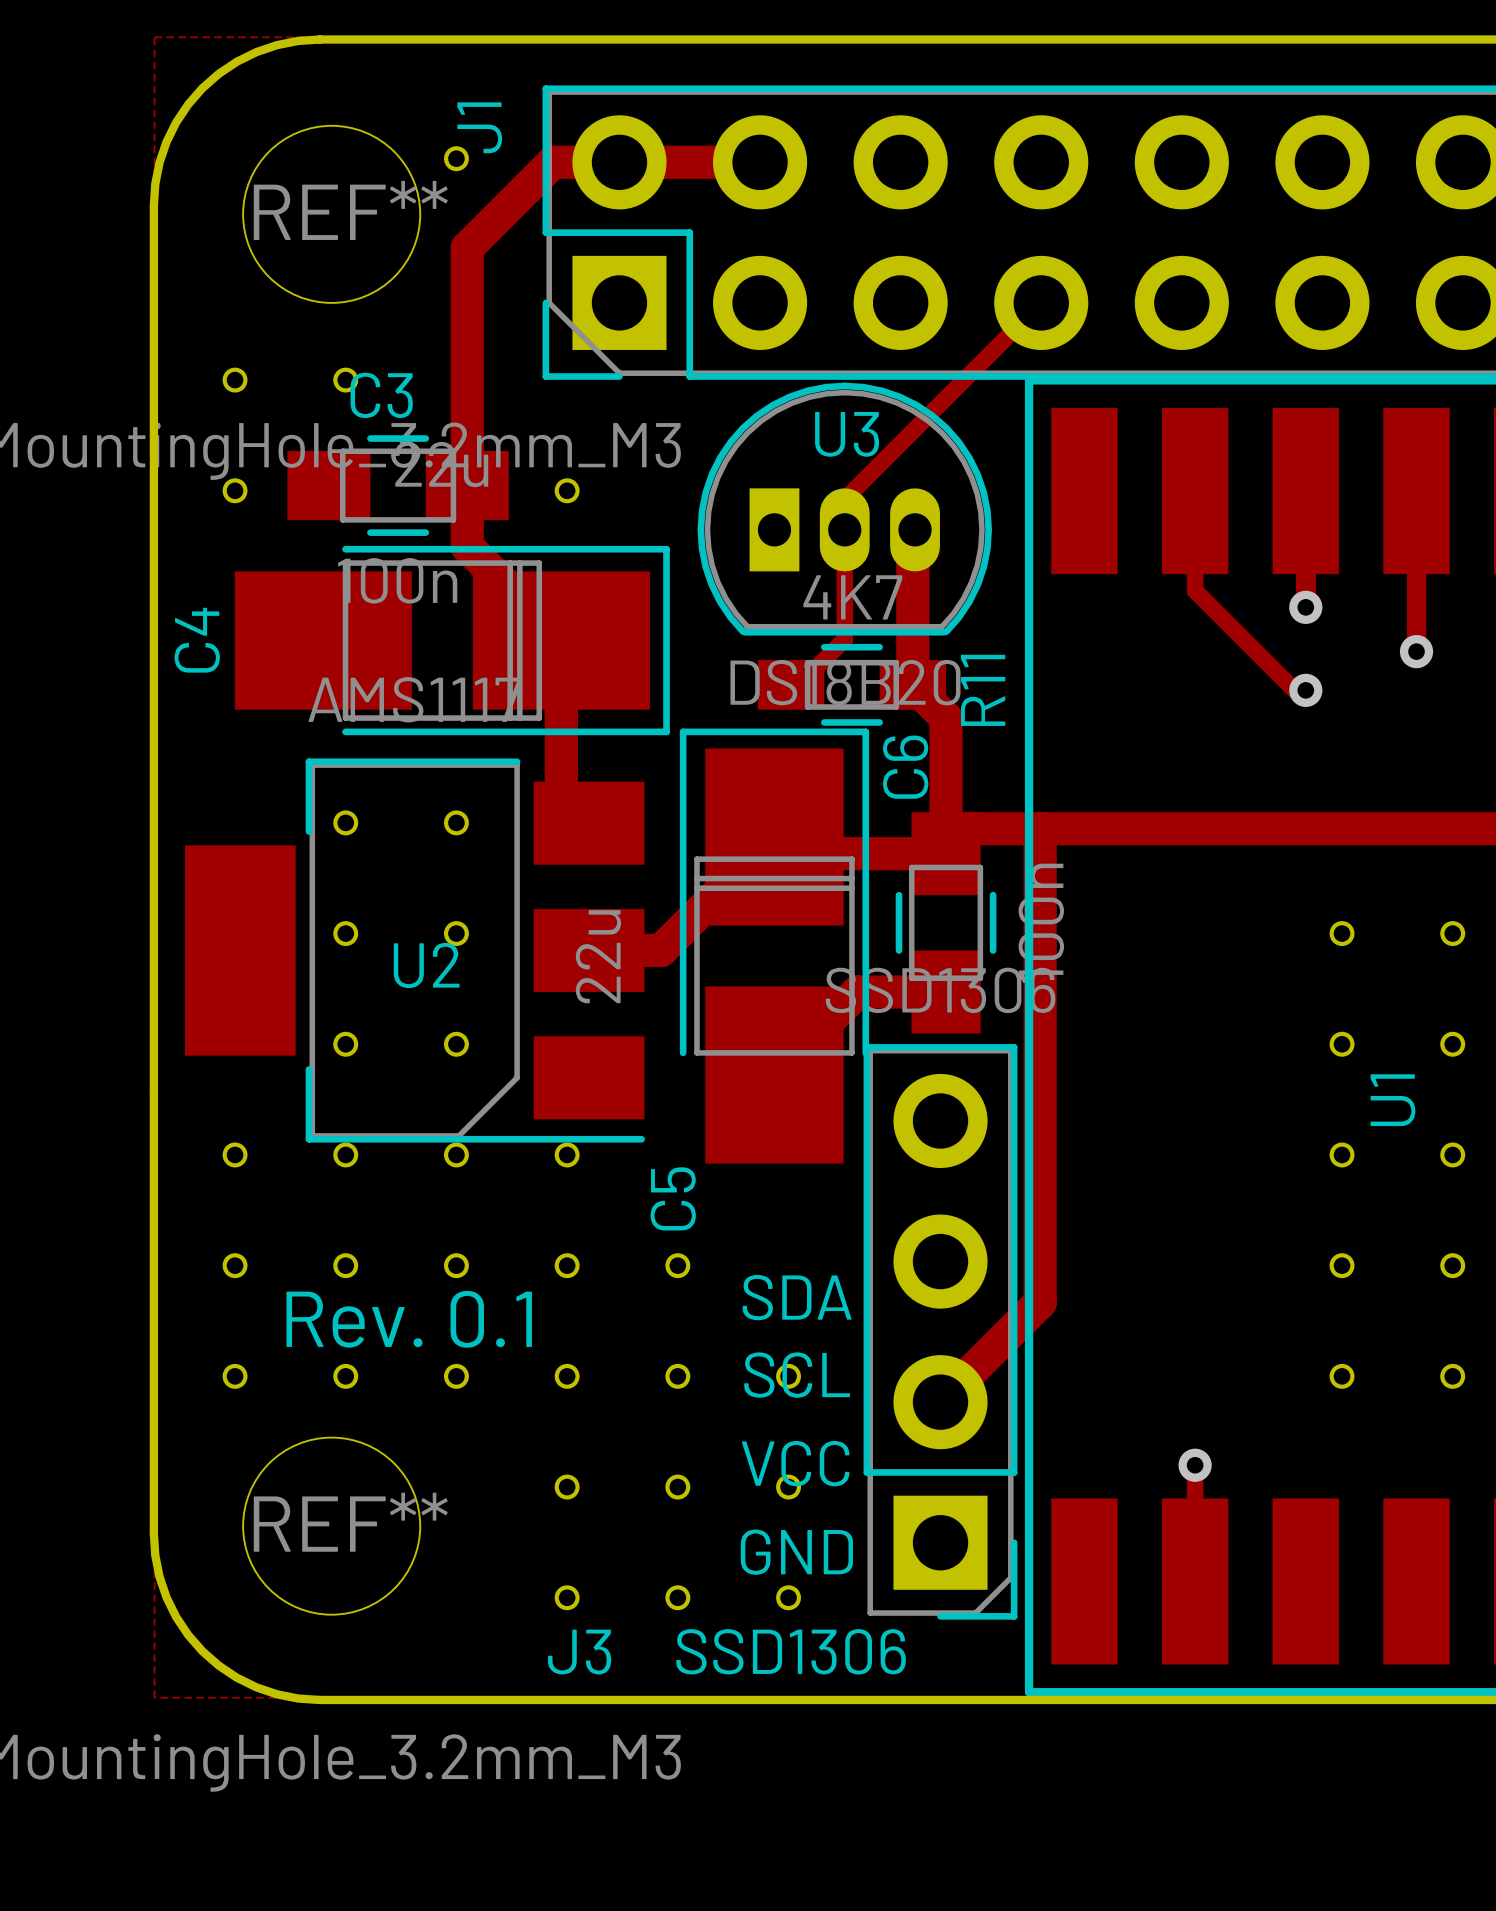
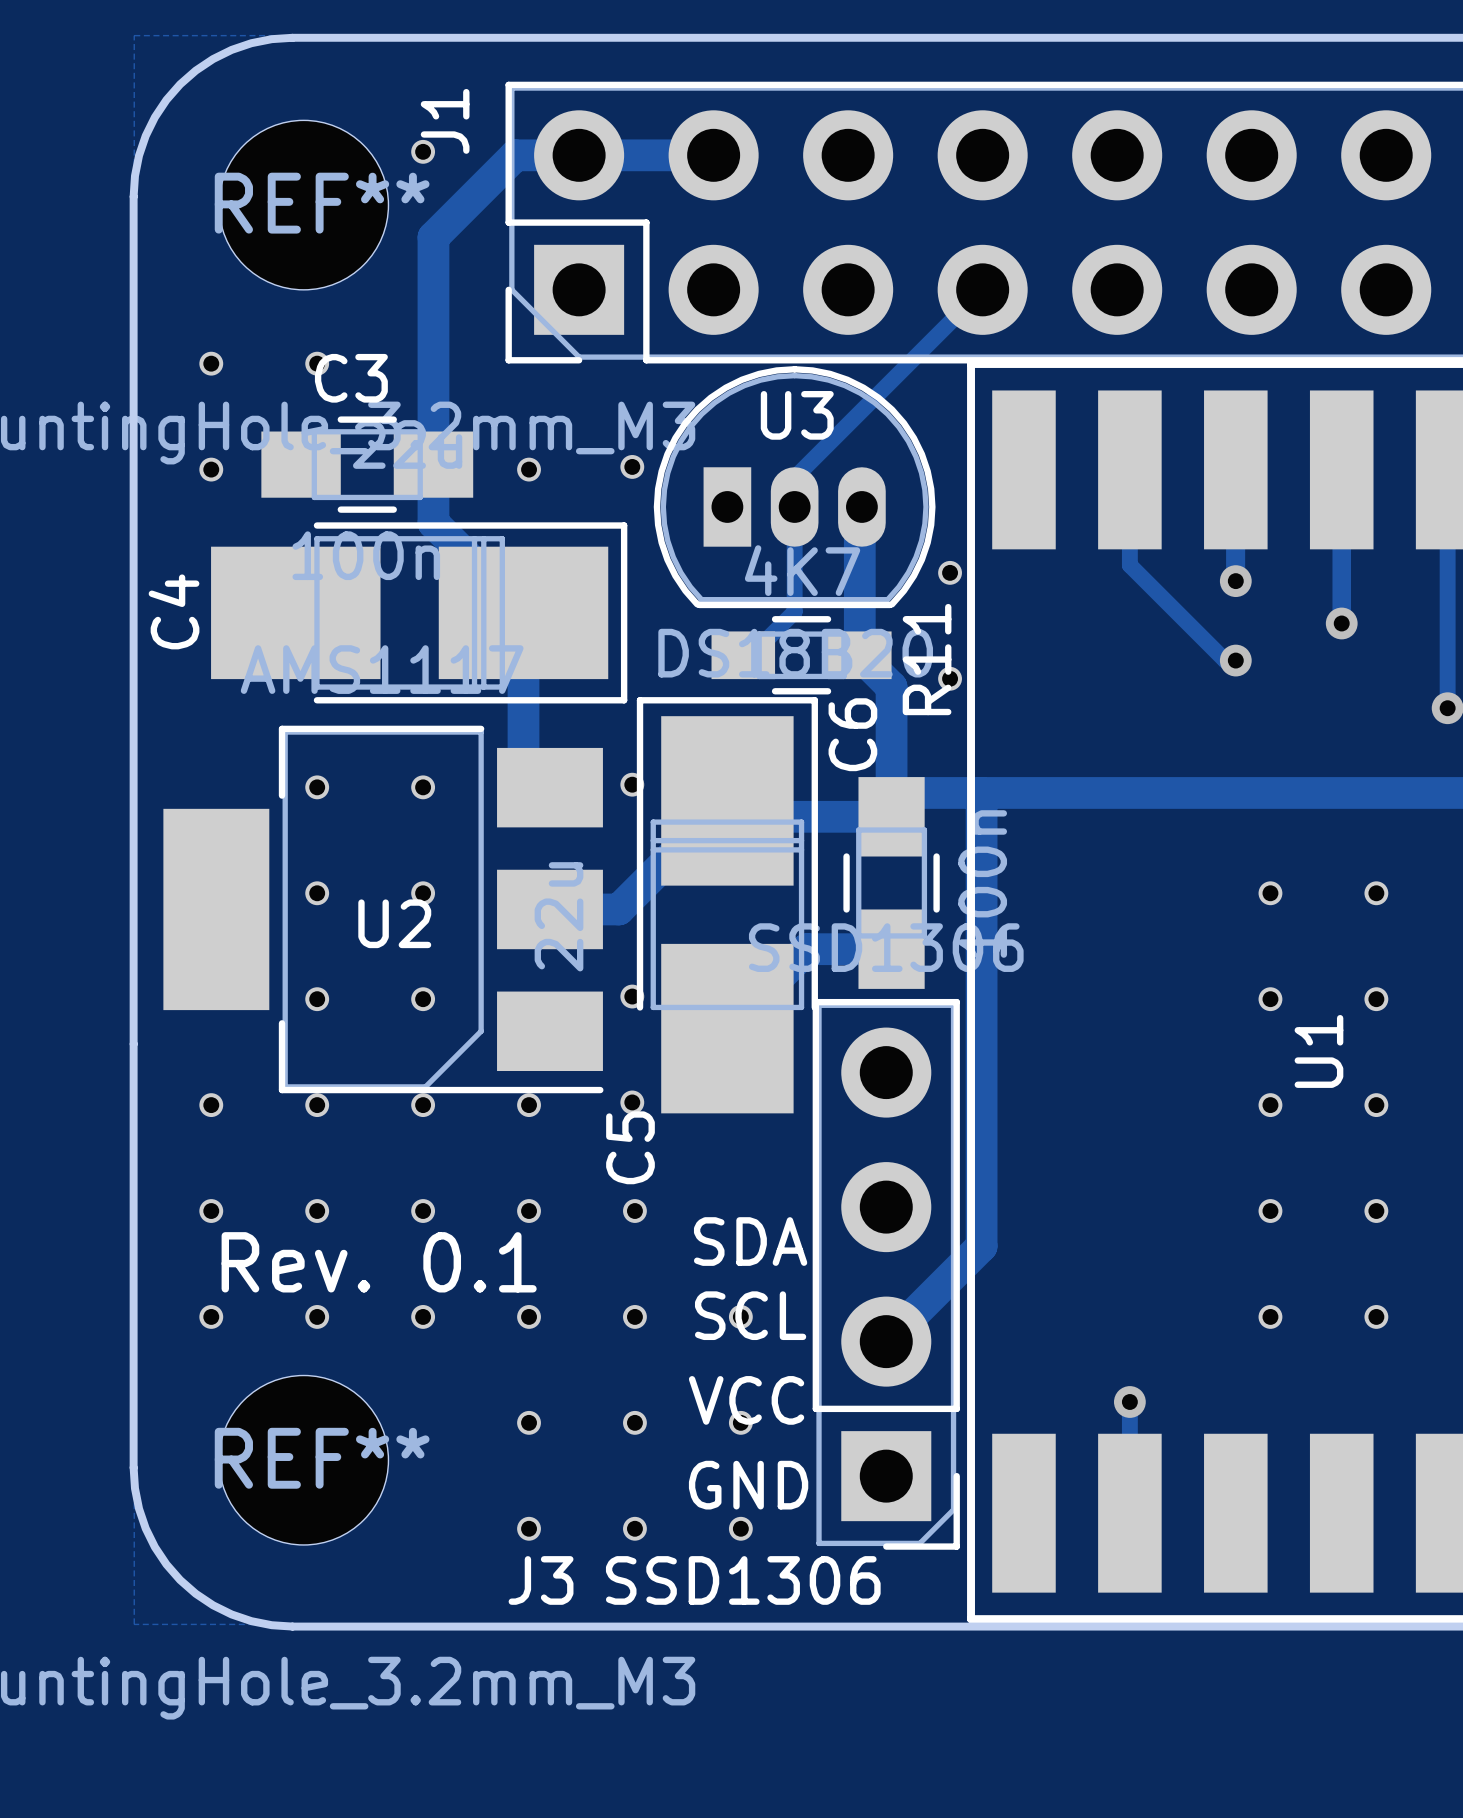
part: none -> (632, 466)
part: none -> (950, 572)
part: none -> (950, 678)
part: none -> (632, 784)
part: none -> (632, 996)
part: none -> (632, 1102)

